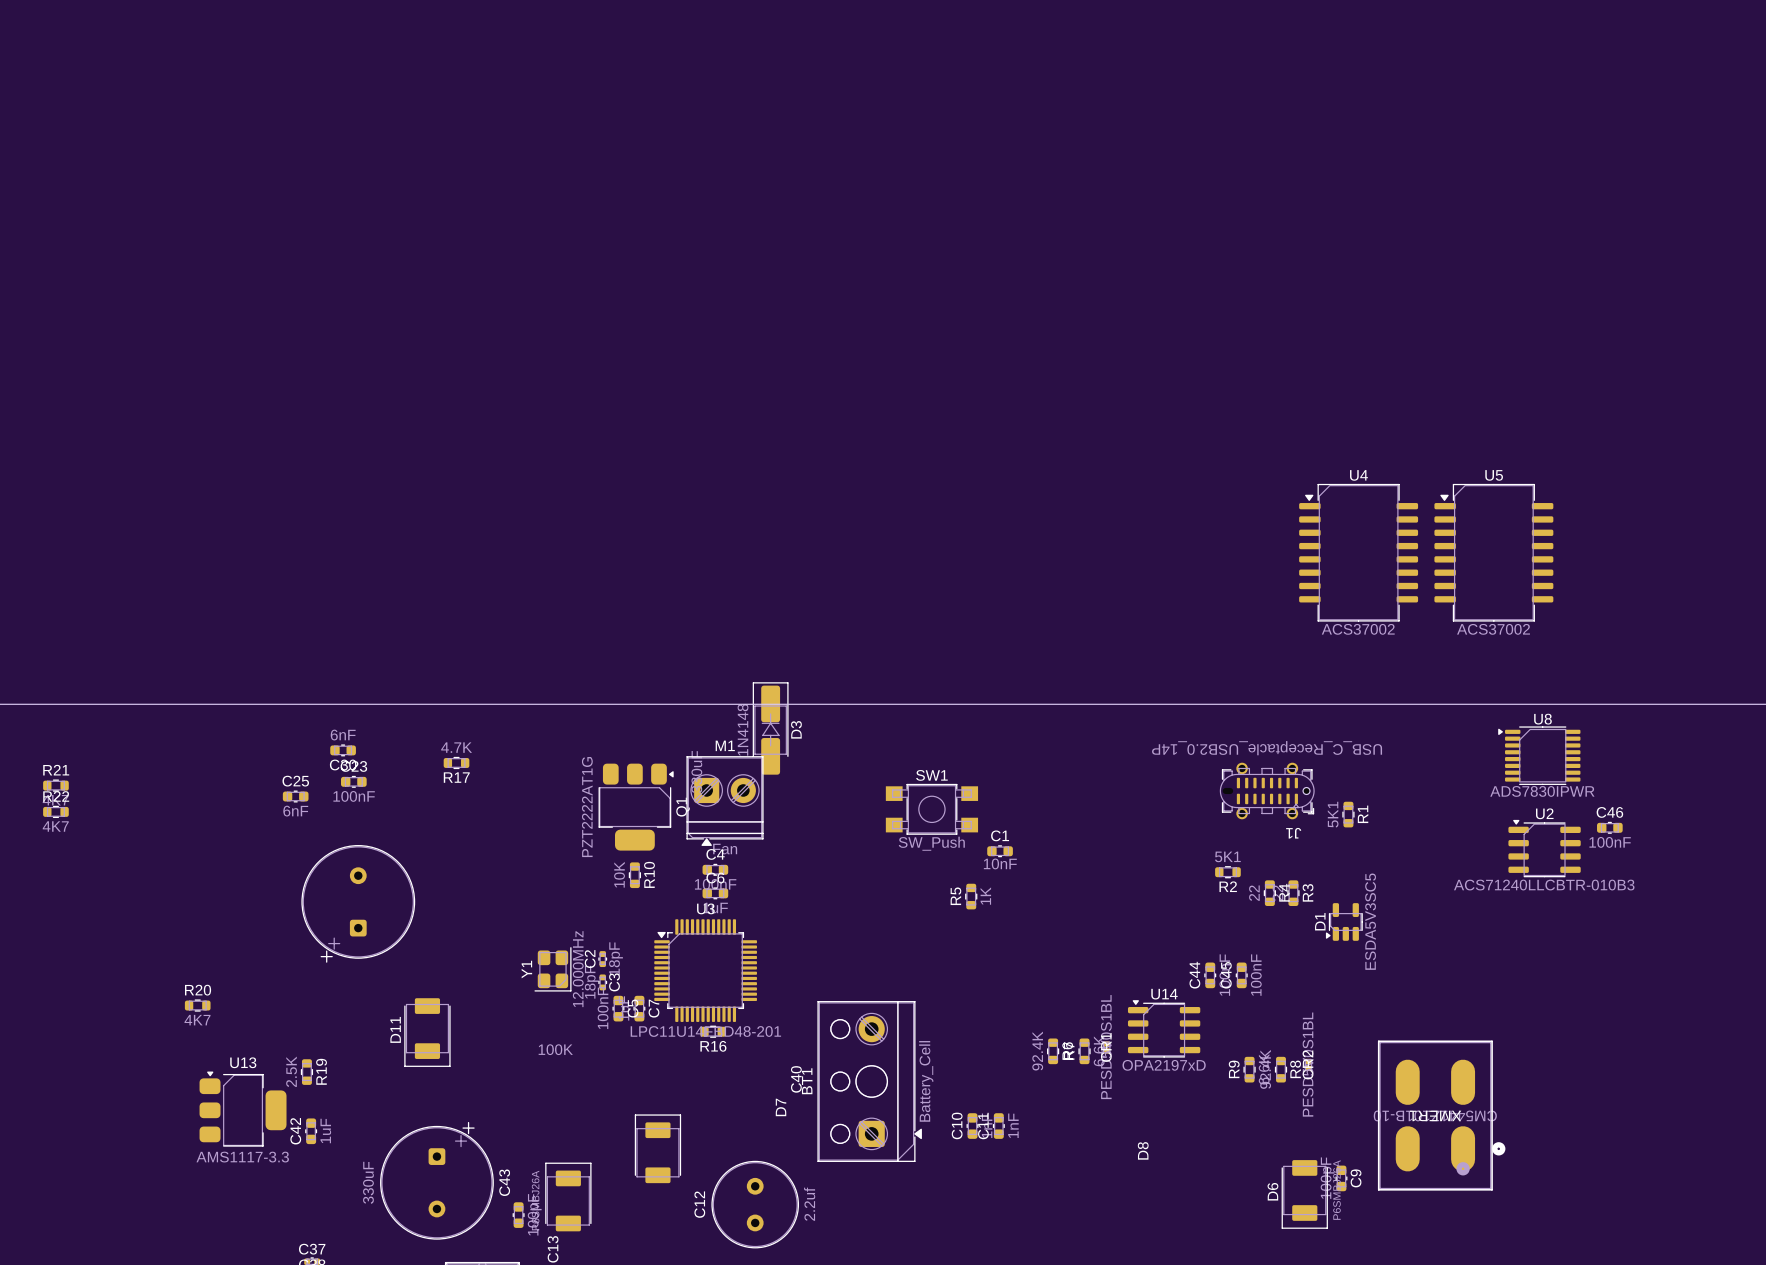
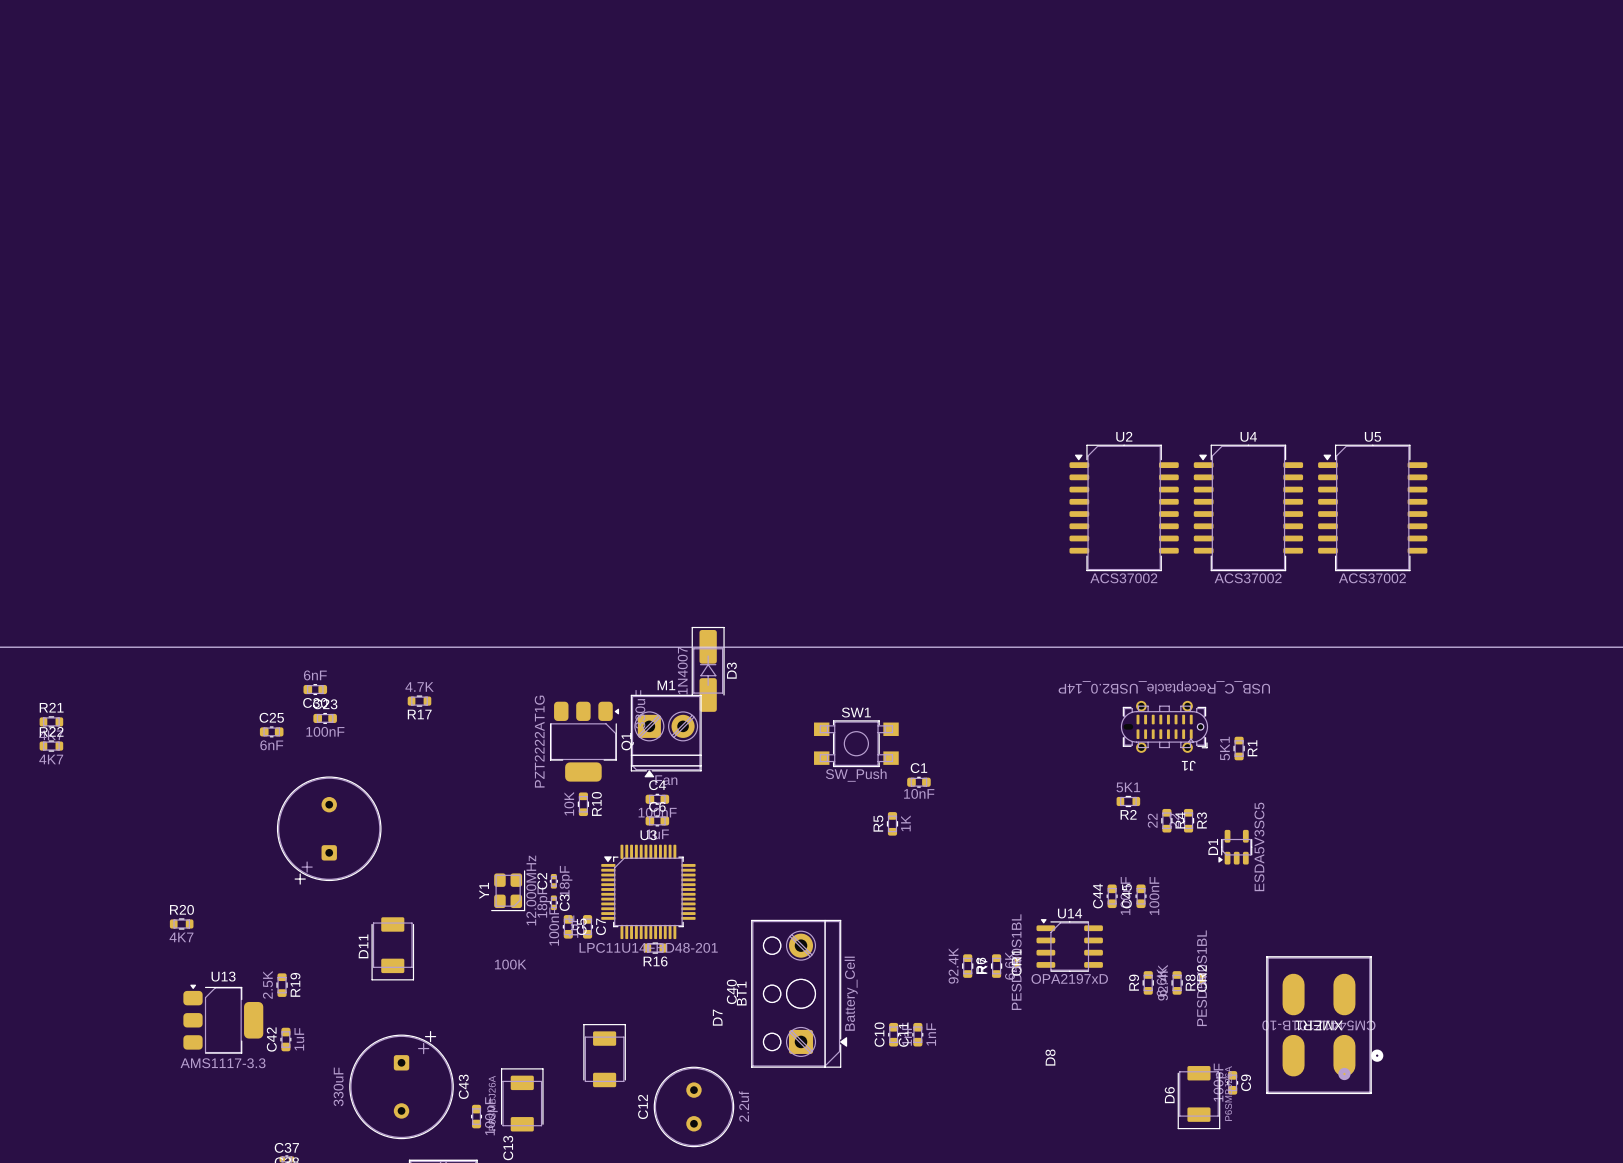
D3 value: 1N4148 (743, 729) -> 1N4007 (682, 670)
U8: ADS7830IPWR (1539, 755) -> none
U2 name position: U2 (1544, 813) -> U2 (1124, 436)
U2 footprint: [1508, 819, 1581, 878] -> [1069, 444, 1179, 572]
C46: 100nF (1609, 827) -> none
U2 value: ACS71240LLCBTR-010B3 (1544, 885) -> ACS37002 (1123, 578)

